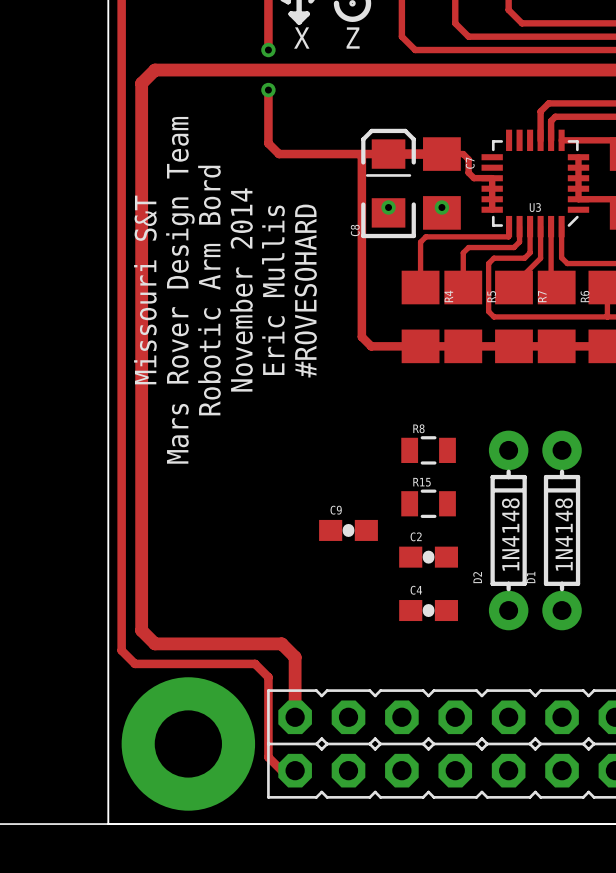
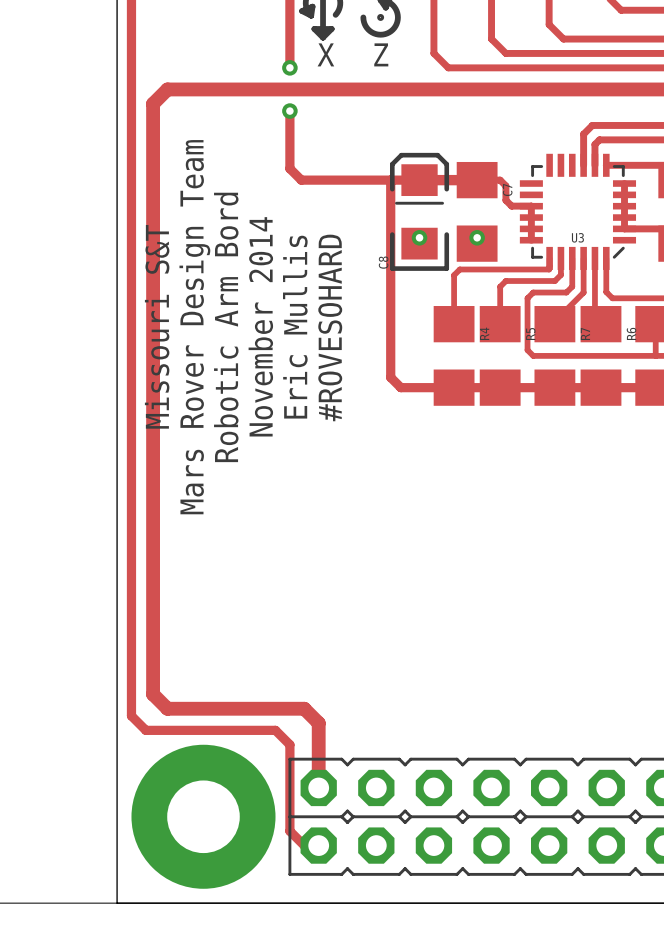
R8: (428, 450) -> none
R15: (428, 503) -> none
C9: (348, 530) -> none
D2: 1N4148 (508, 530) -> none
D1: 1N4148 (562, 530) -> none
C2: (428, 557) -> none
C4: (428, 610) -> none

